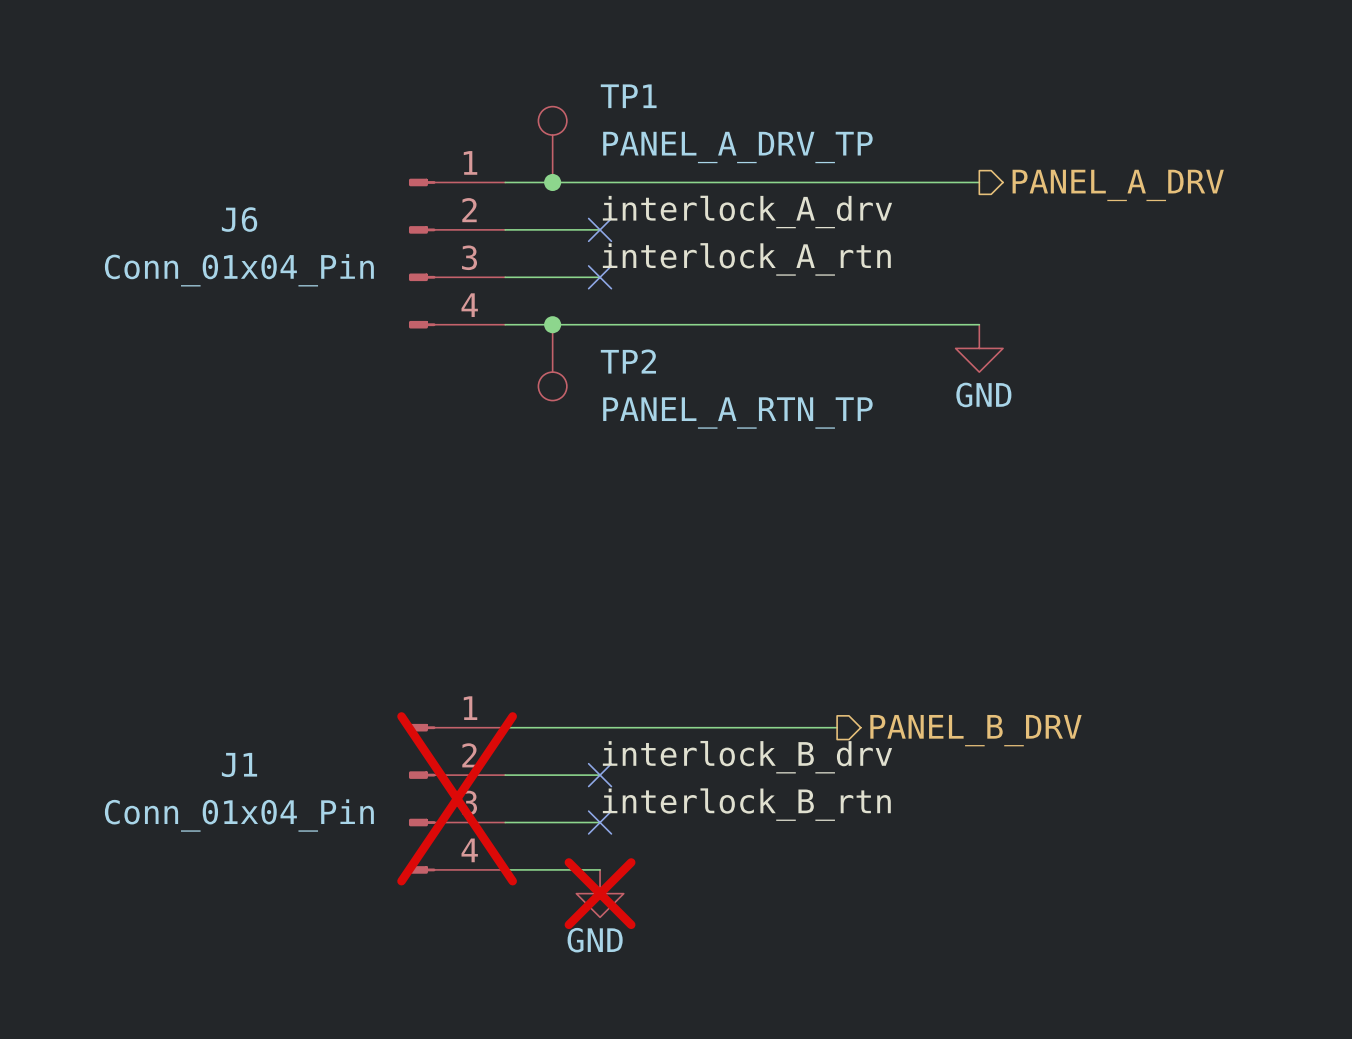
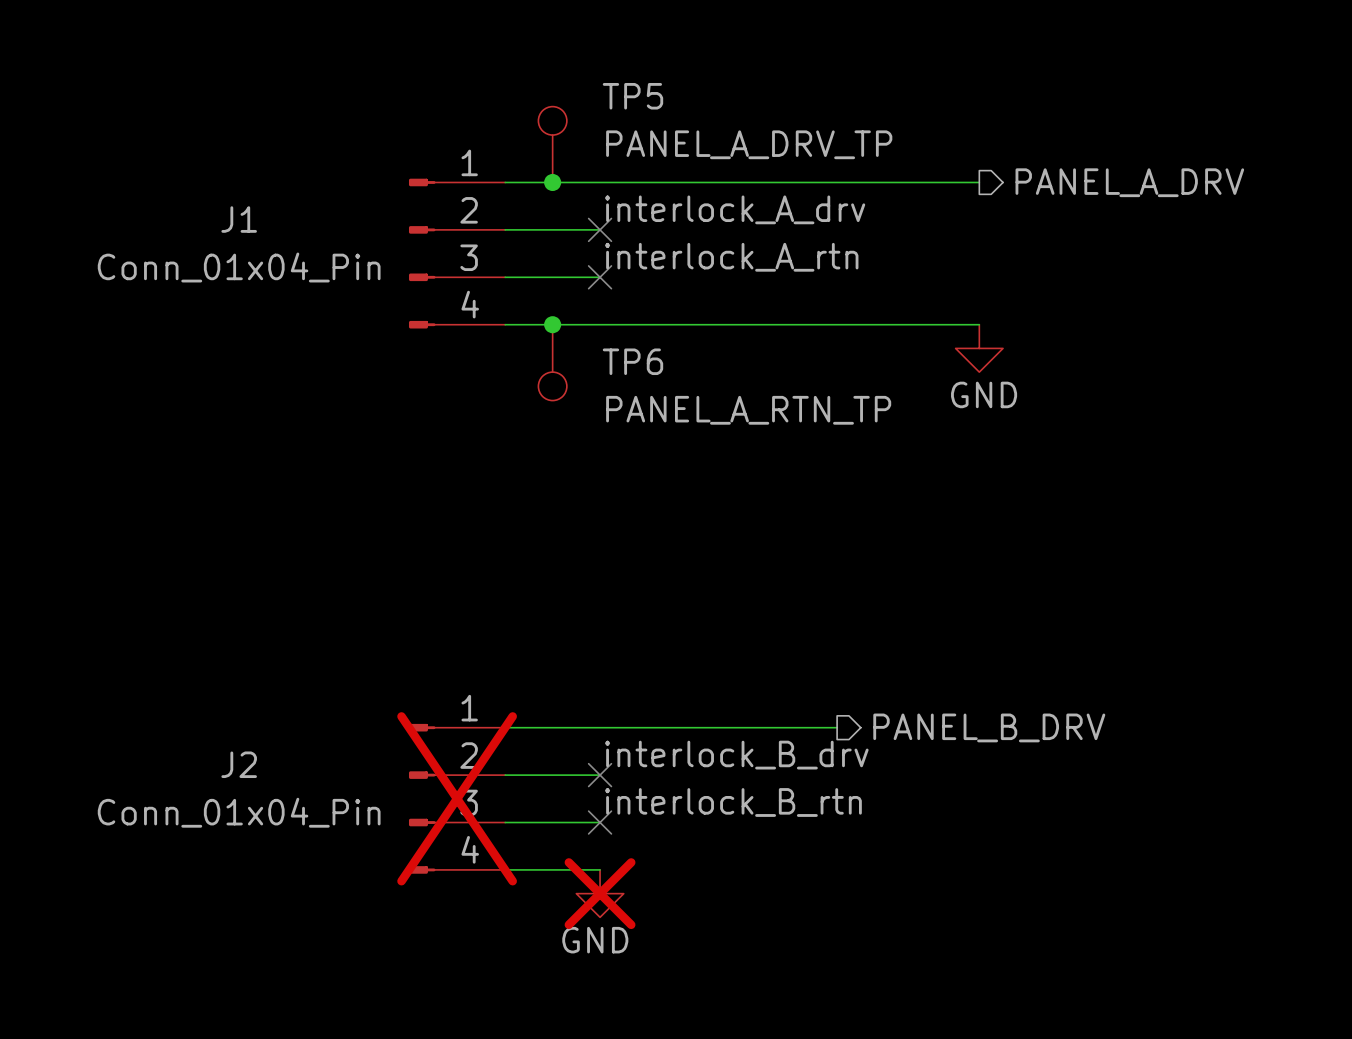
TP1 name: TP1 (628, 96) -> TP5 (632, 96)
J6 name: J6 (239, 219) -> J1 (239, 219)
TP2 name: TP2 (628, 361) -> TP6 (632, 361)
J1 name: J1 (239, 764) -> J2 (239, 764)

